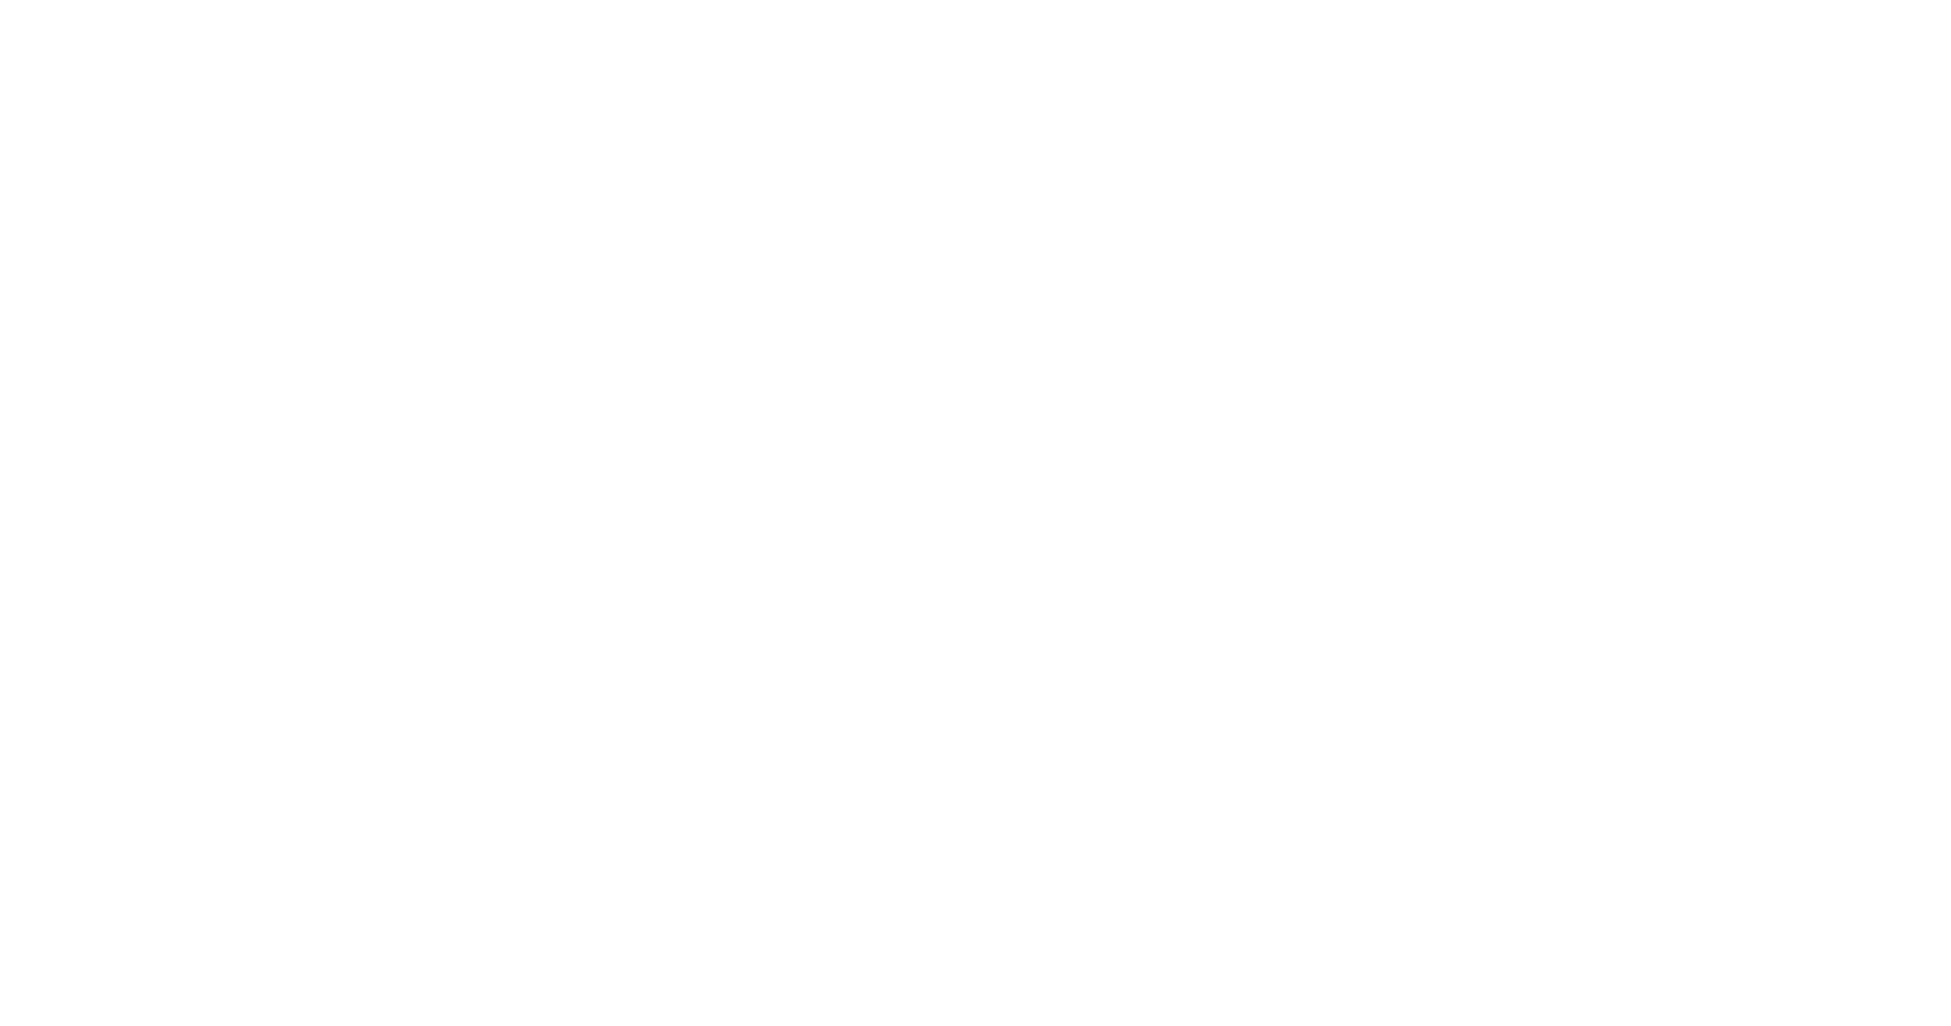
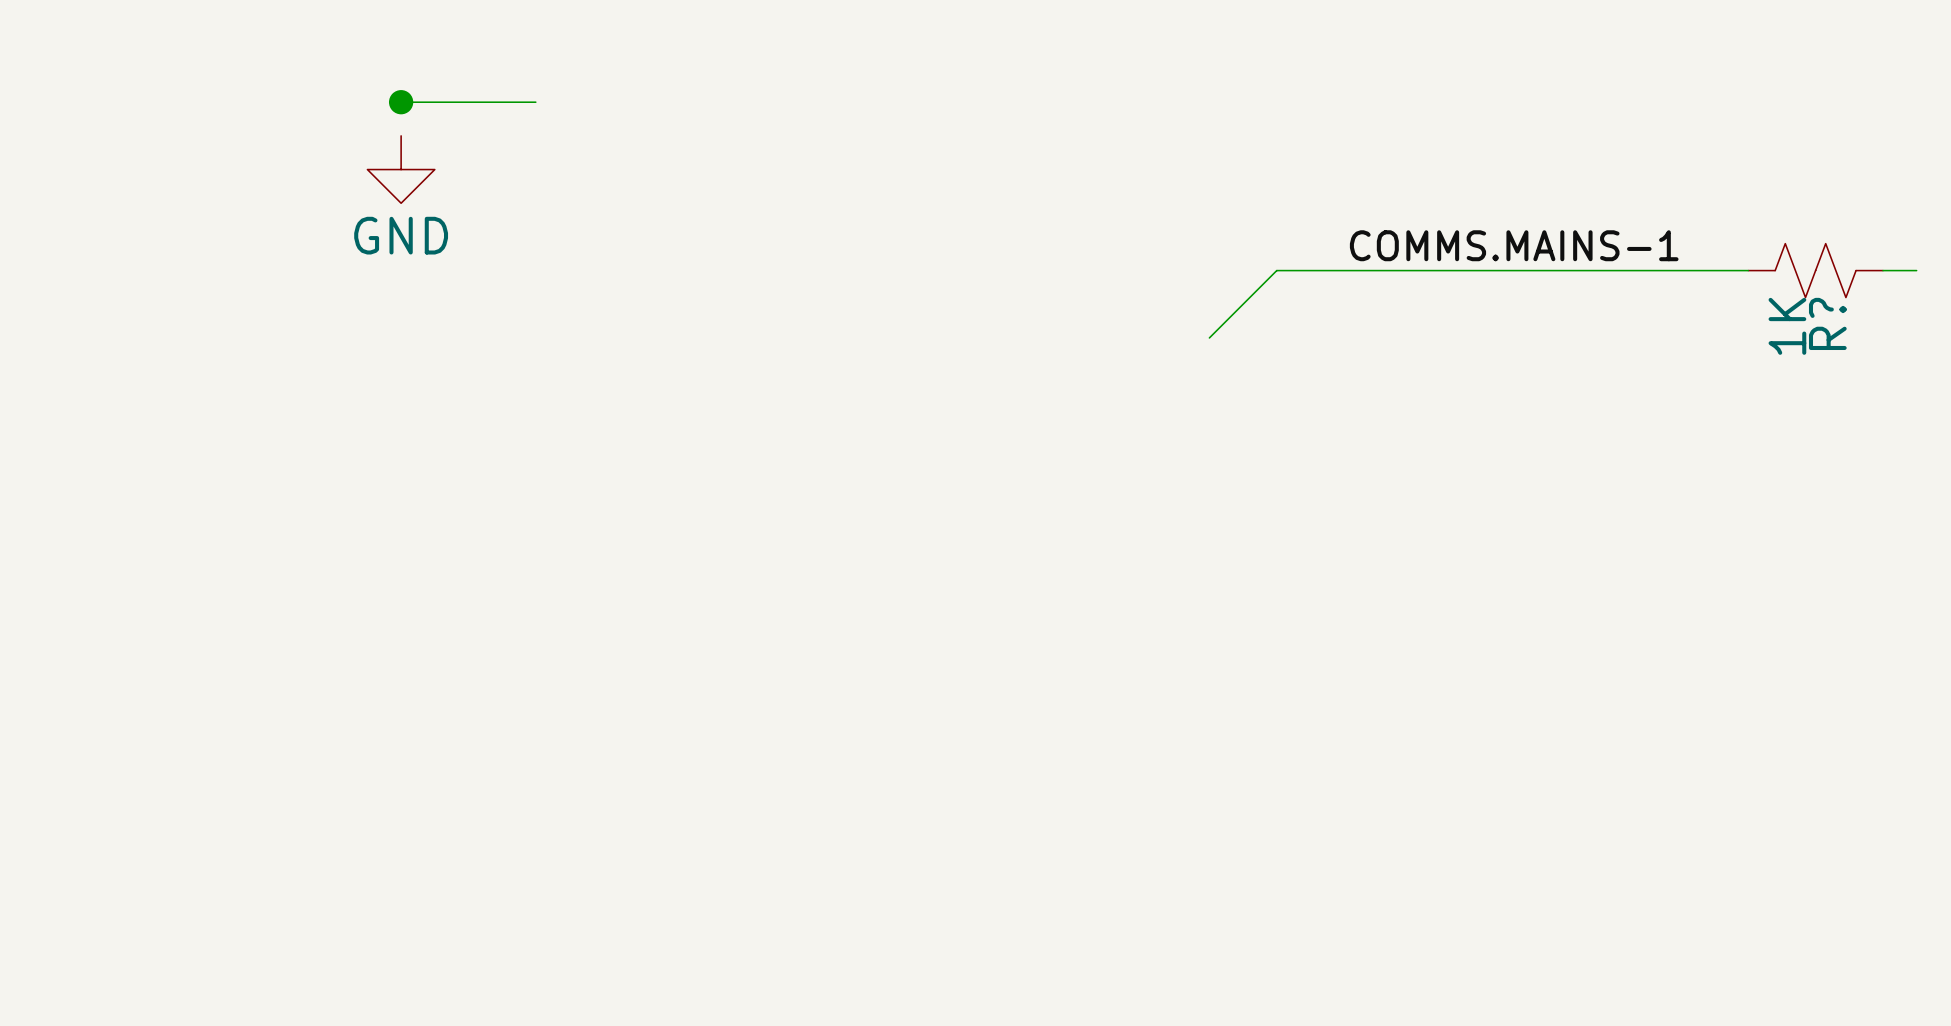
wire: none -> (401, 102) (535, 102)
junction: none -> (401, 102)
power symbol: none -> GND (401, 169)
label: none -> COMMS.MAINS-1 (1514, 245)
wire: none -> (1748, 270) (1276, 270) (1209, 337)
R?: none -> 1K (1815, 270)
wire: none -> (1882, 270) (1916, 270)

